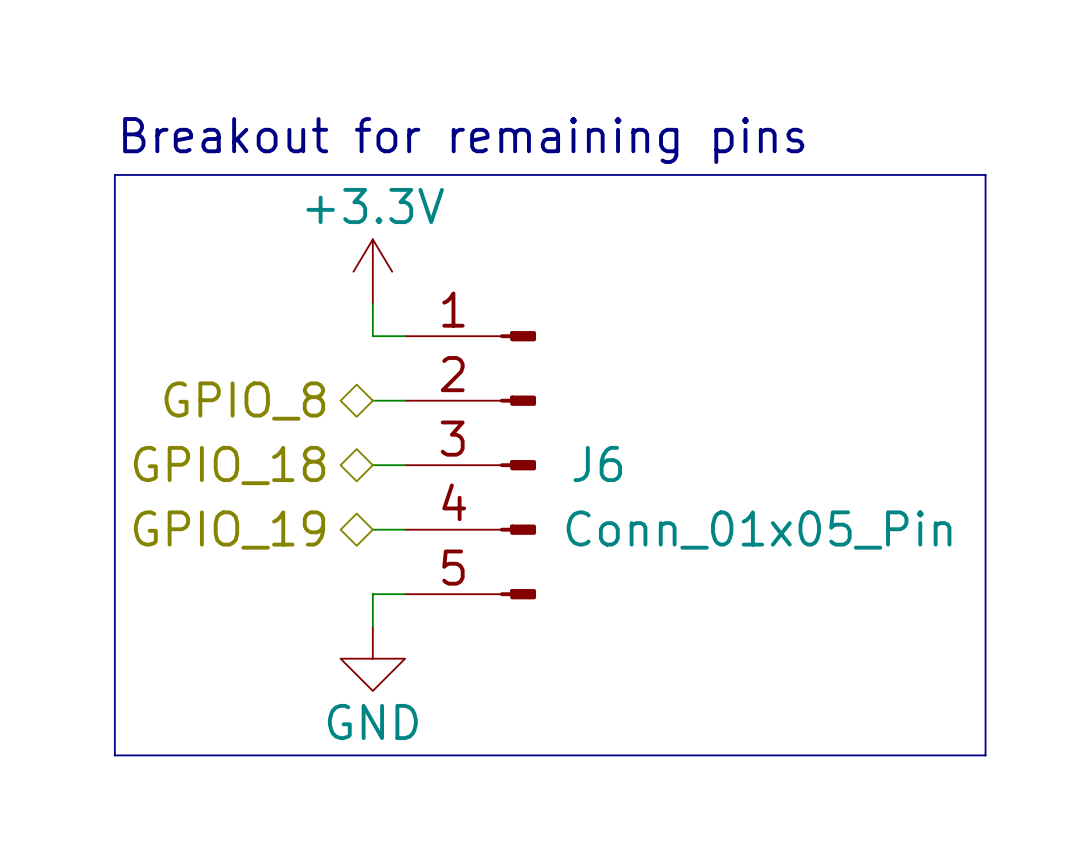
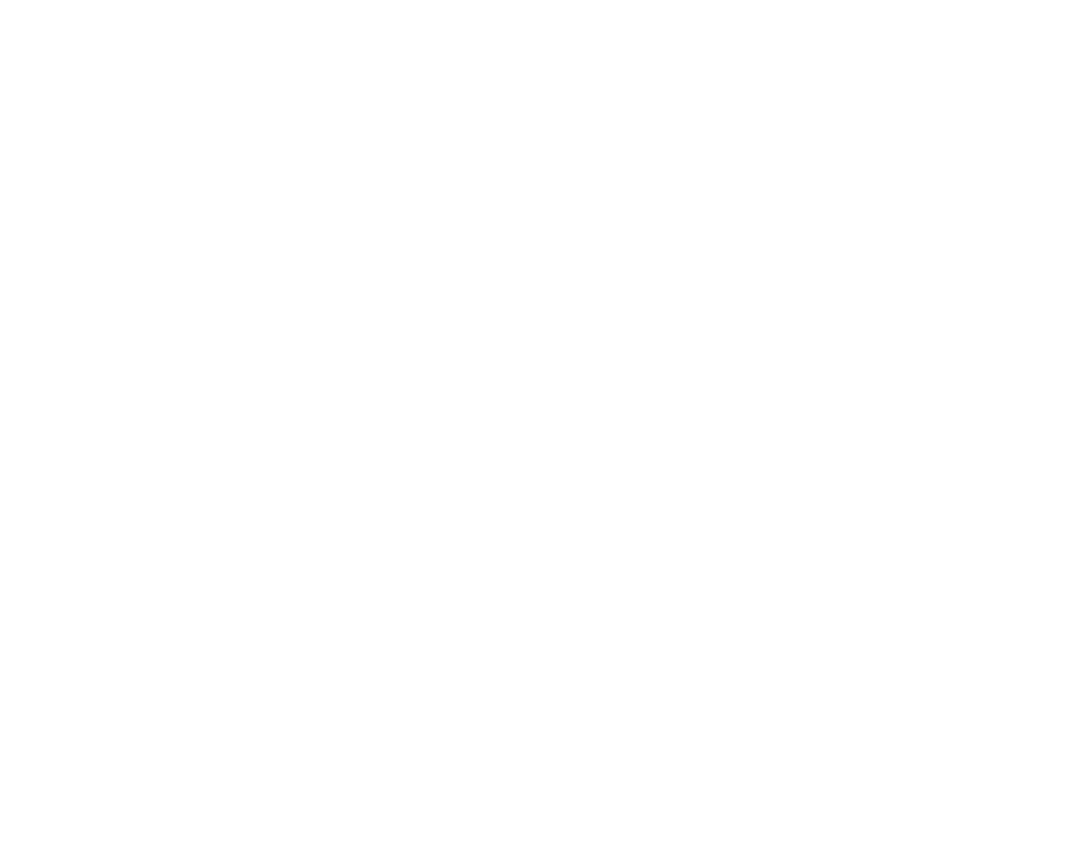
text: Breakout for remaining pins (463, 140) -> none
line: (114, 174) (985, 174) (985, 755) (114, 755) (114, 174) -> none
power symbol: +3.3V (372, 271) -> none
wire: (372, 303) (372, 336) (405, 336) -> none
wire: (372, 400) (405, 400) -> none
hierarchical label: GPIO_8 (244, 401) -> none
hierarchical label: GPIO_18 (229, 465) -> none
wire: (372, 465) (405, 465) -> none
J6: Conn_01x05_Pin (470, 465) -> none
wire: (372, 529) (405, 529) -> none
hierarchical label: GPIO_19 (229, 530) -> none
wire: (405, 594) (372, 594) (372, 626) -> none
power symbol: GND (372, 658) -> none

